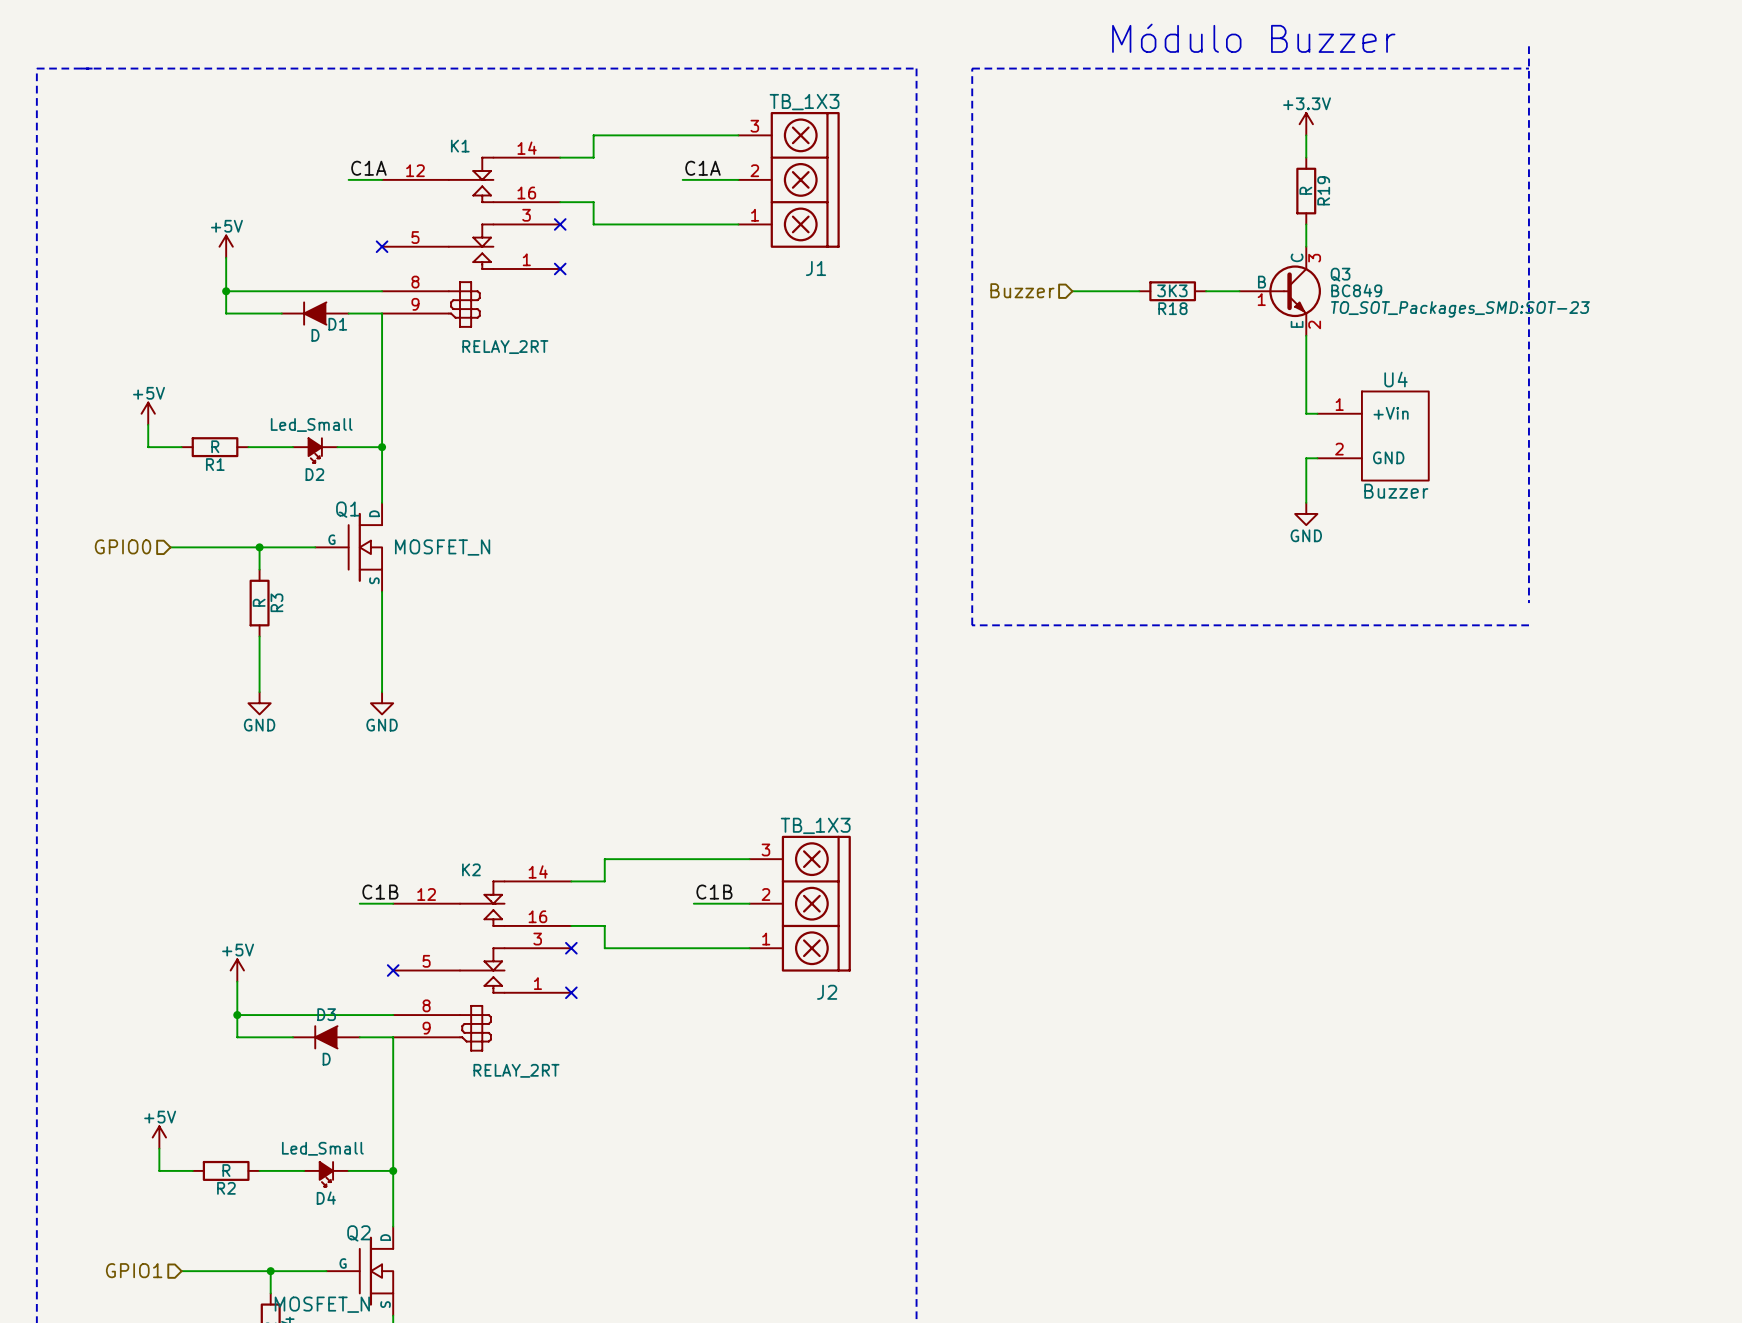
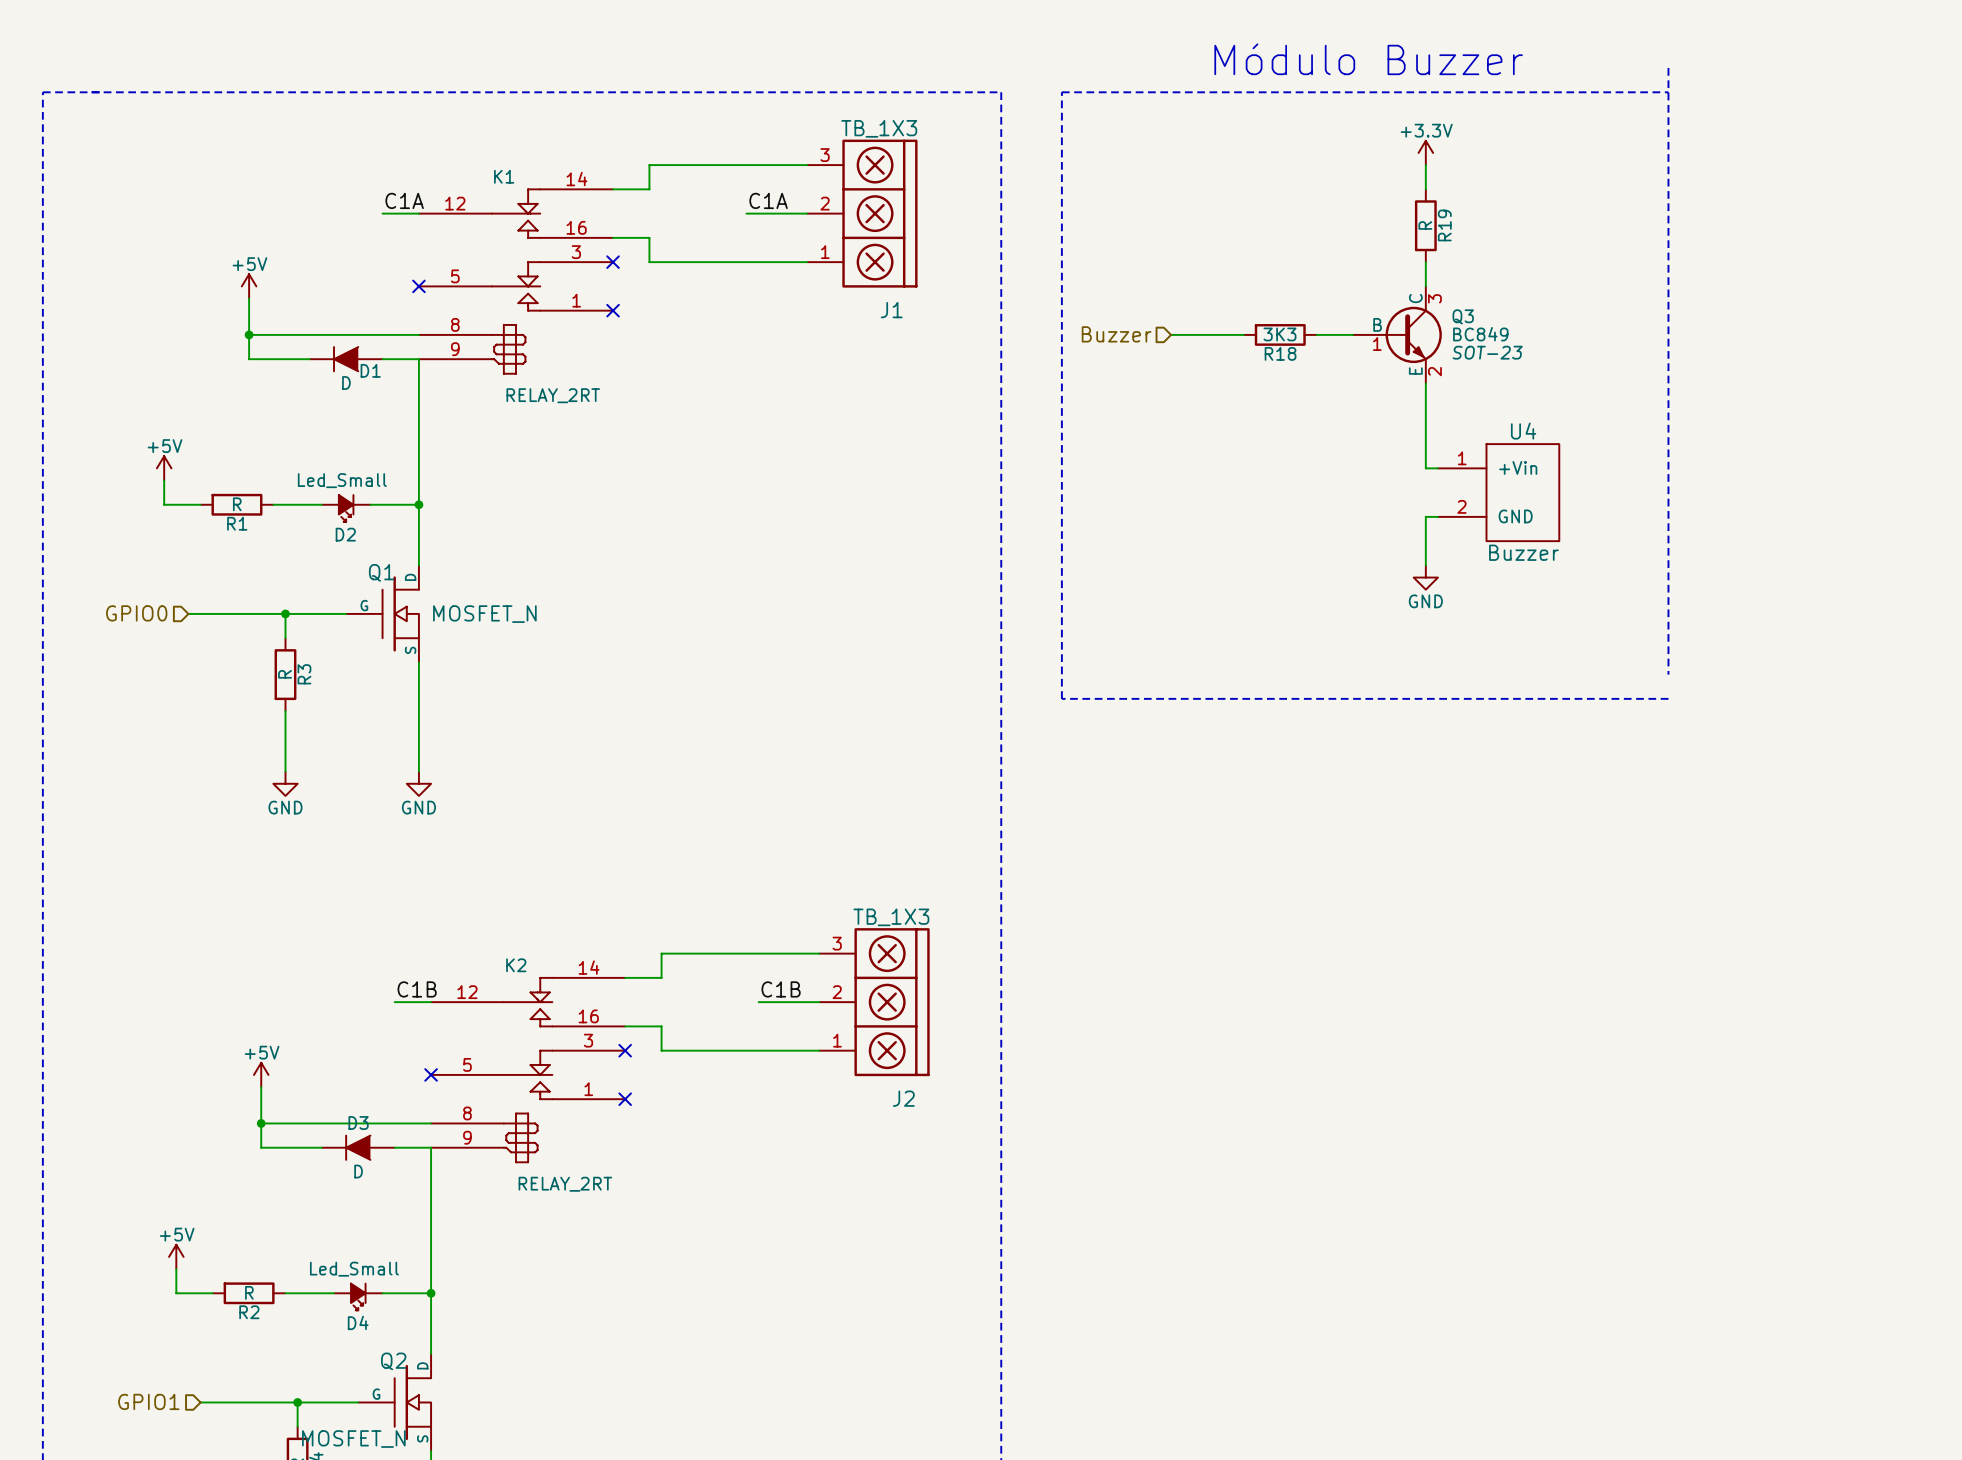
Q3 text: TO_SOT_Packages_SMD:SOT-23 (1460, 309) -> SOT-23 (1487, 352)

